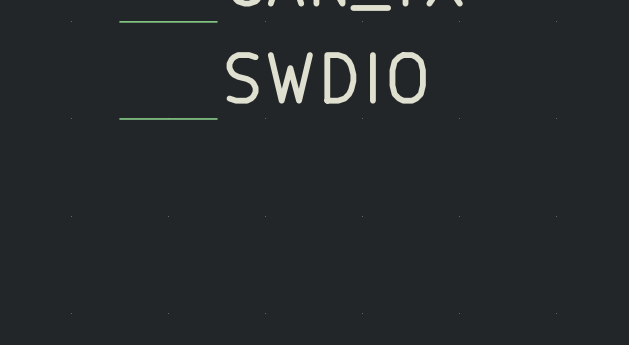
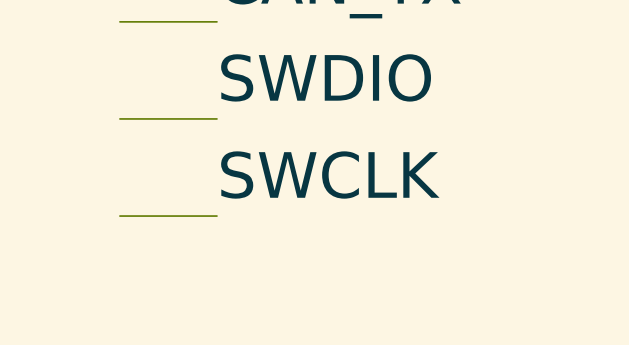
label: none -> SWCLK (330, 175)
wire: none -> (119, 216) (216, 216)

